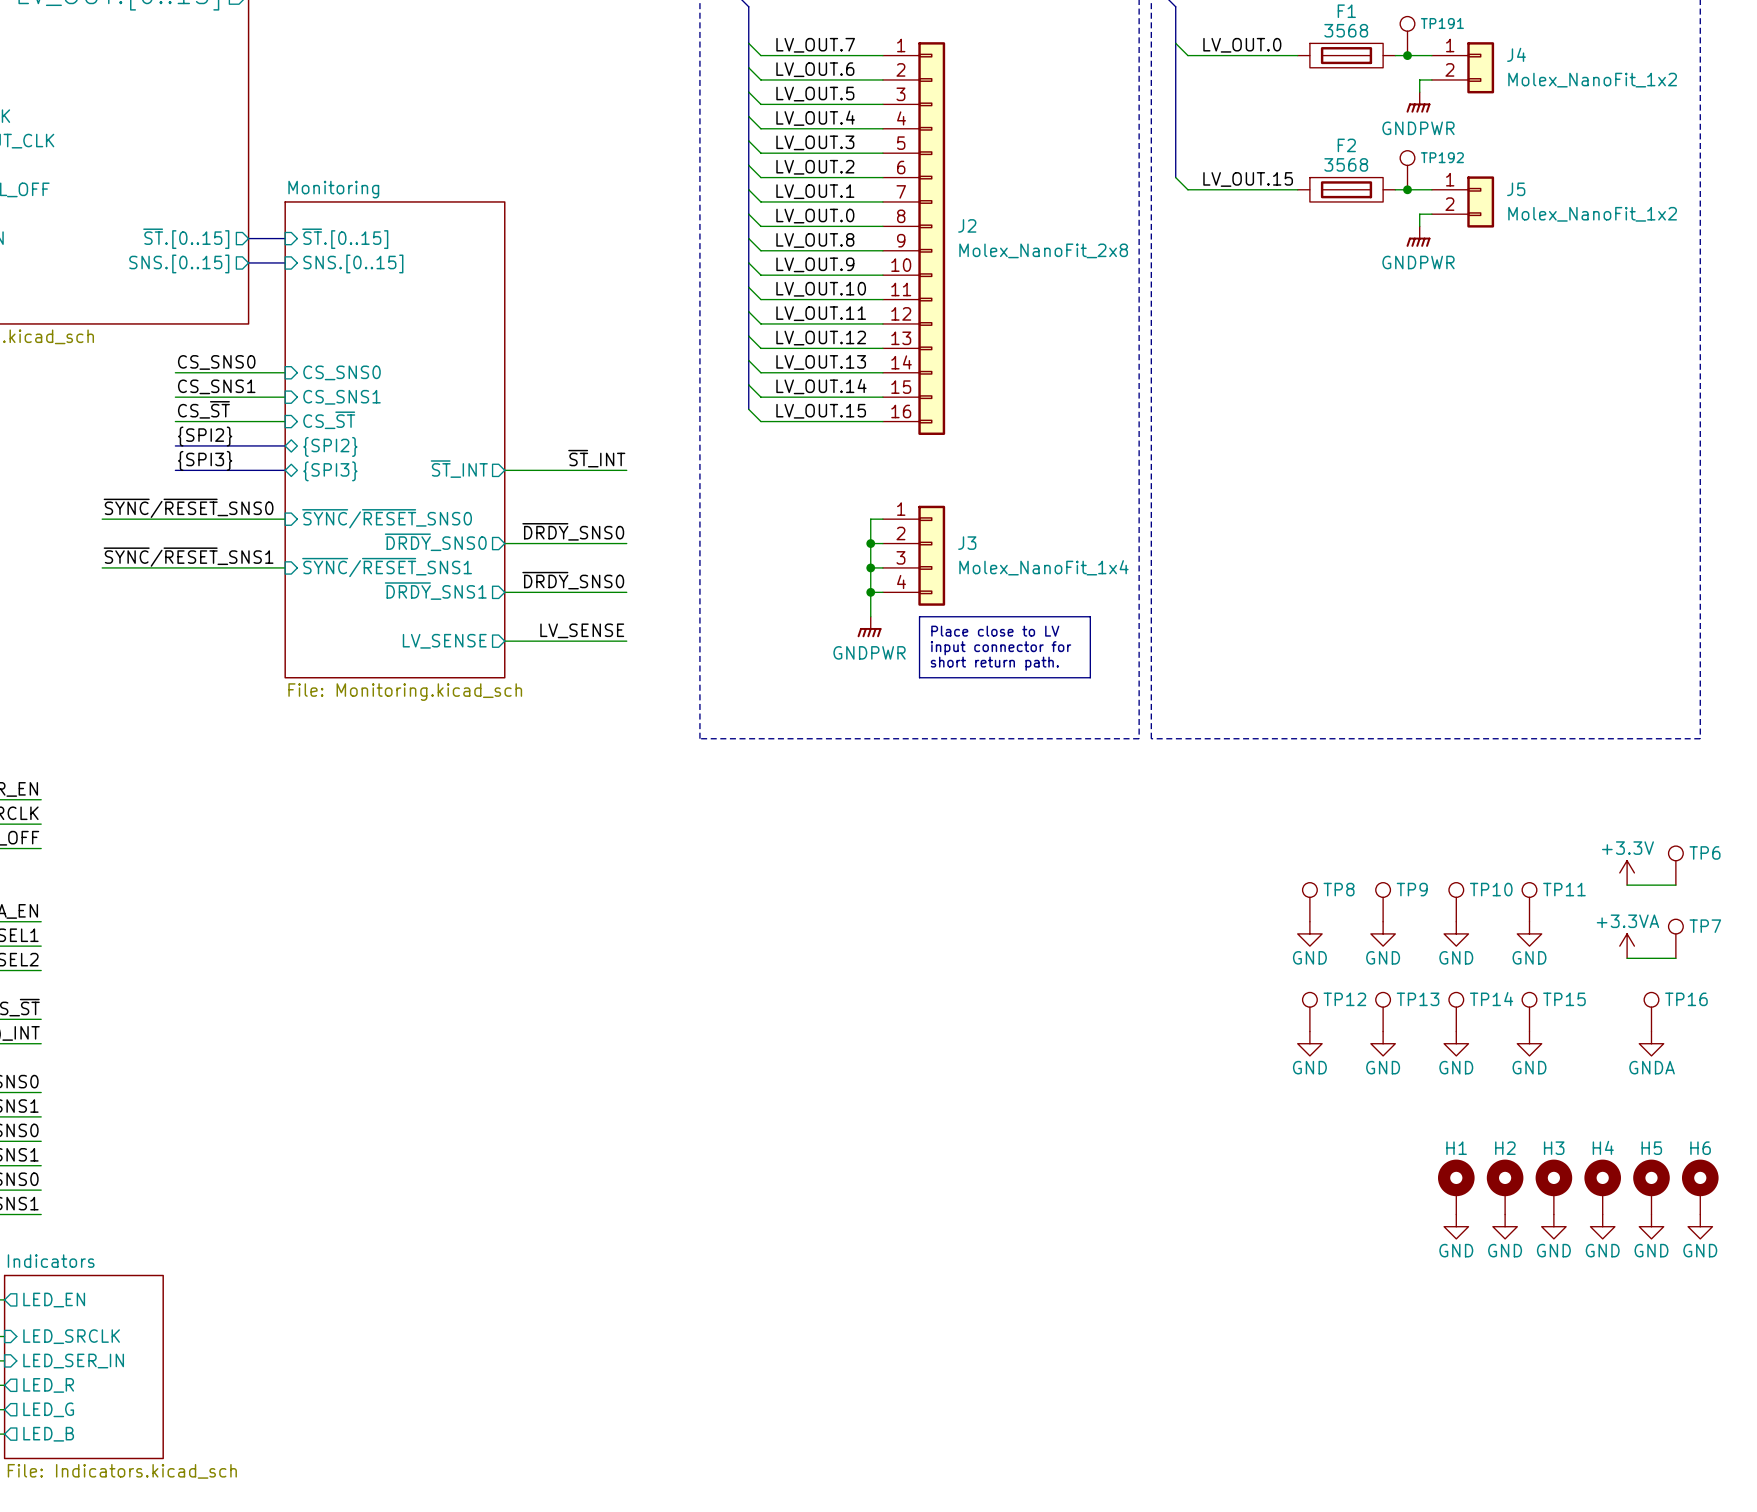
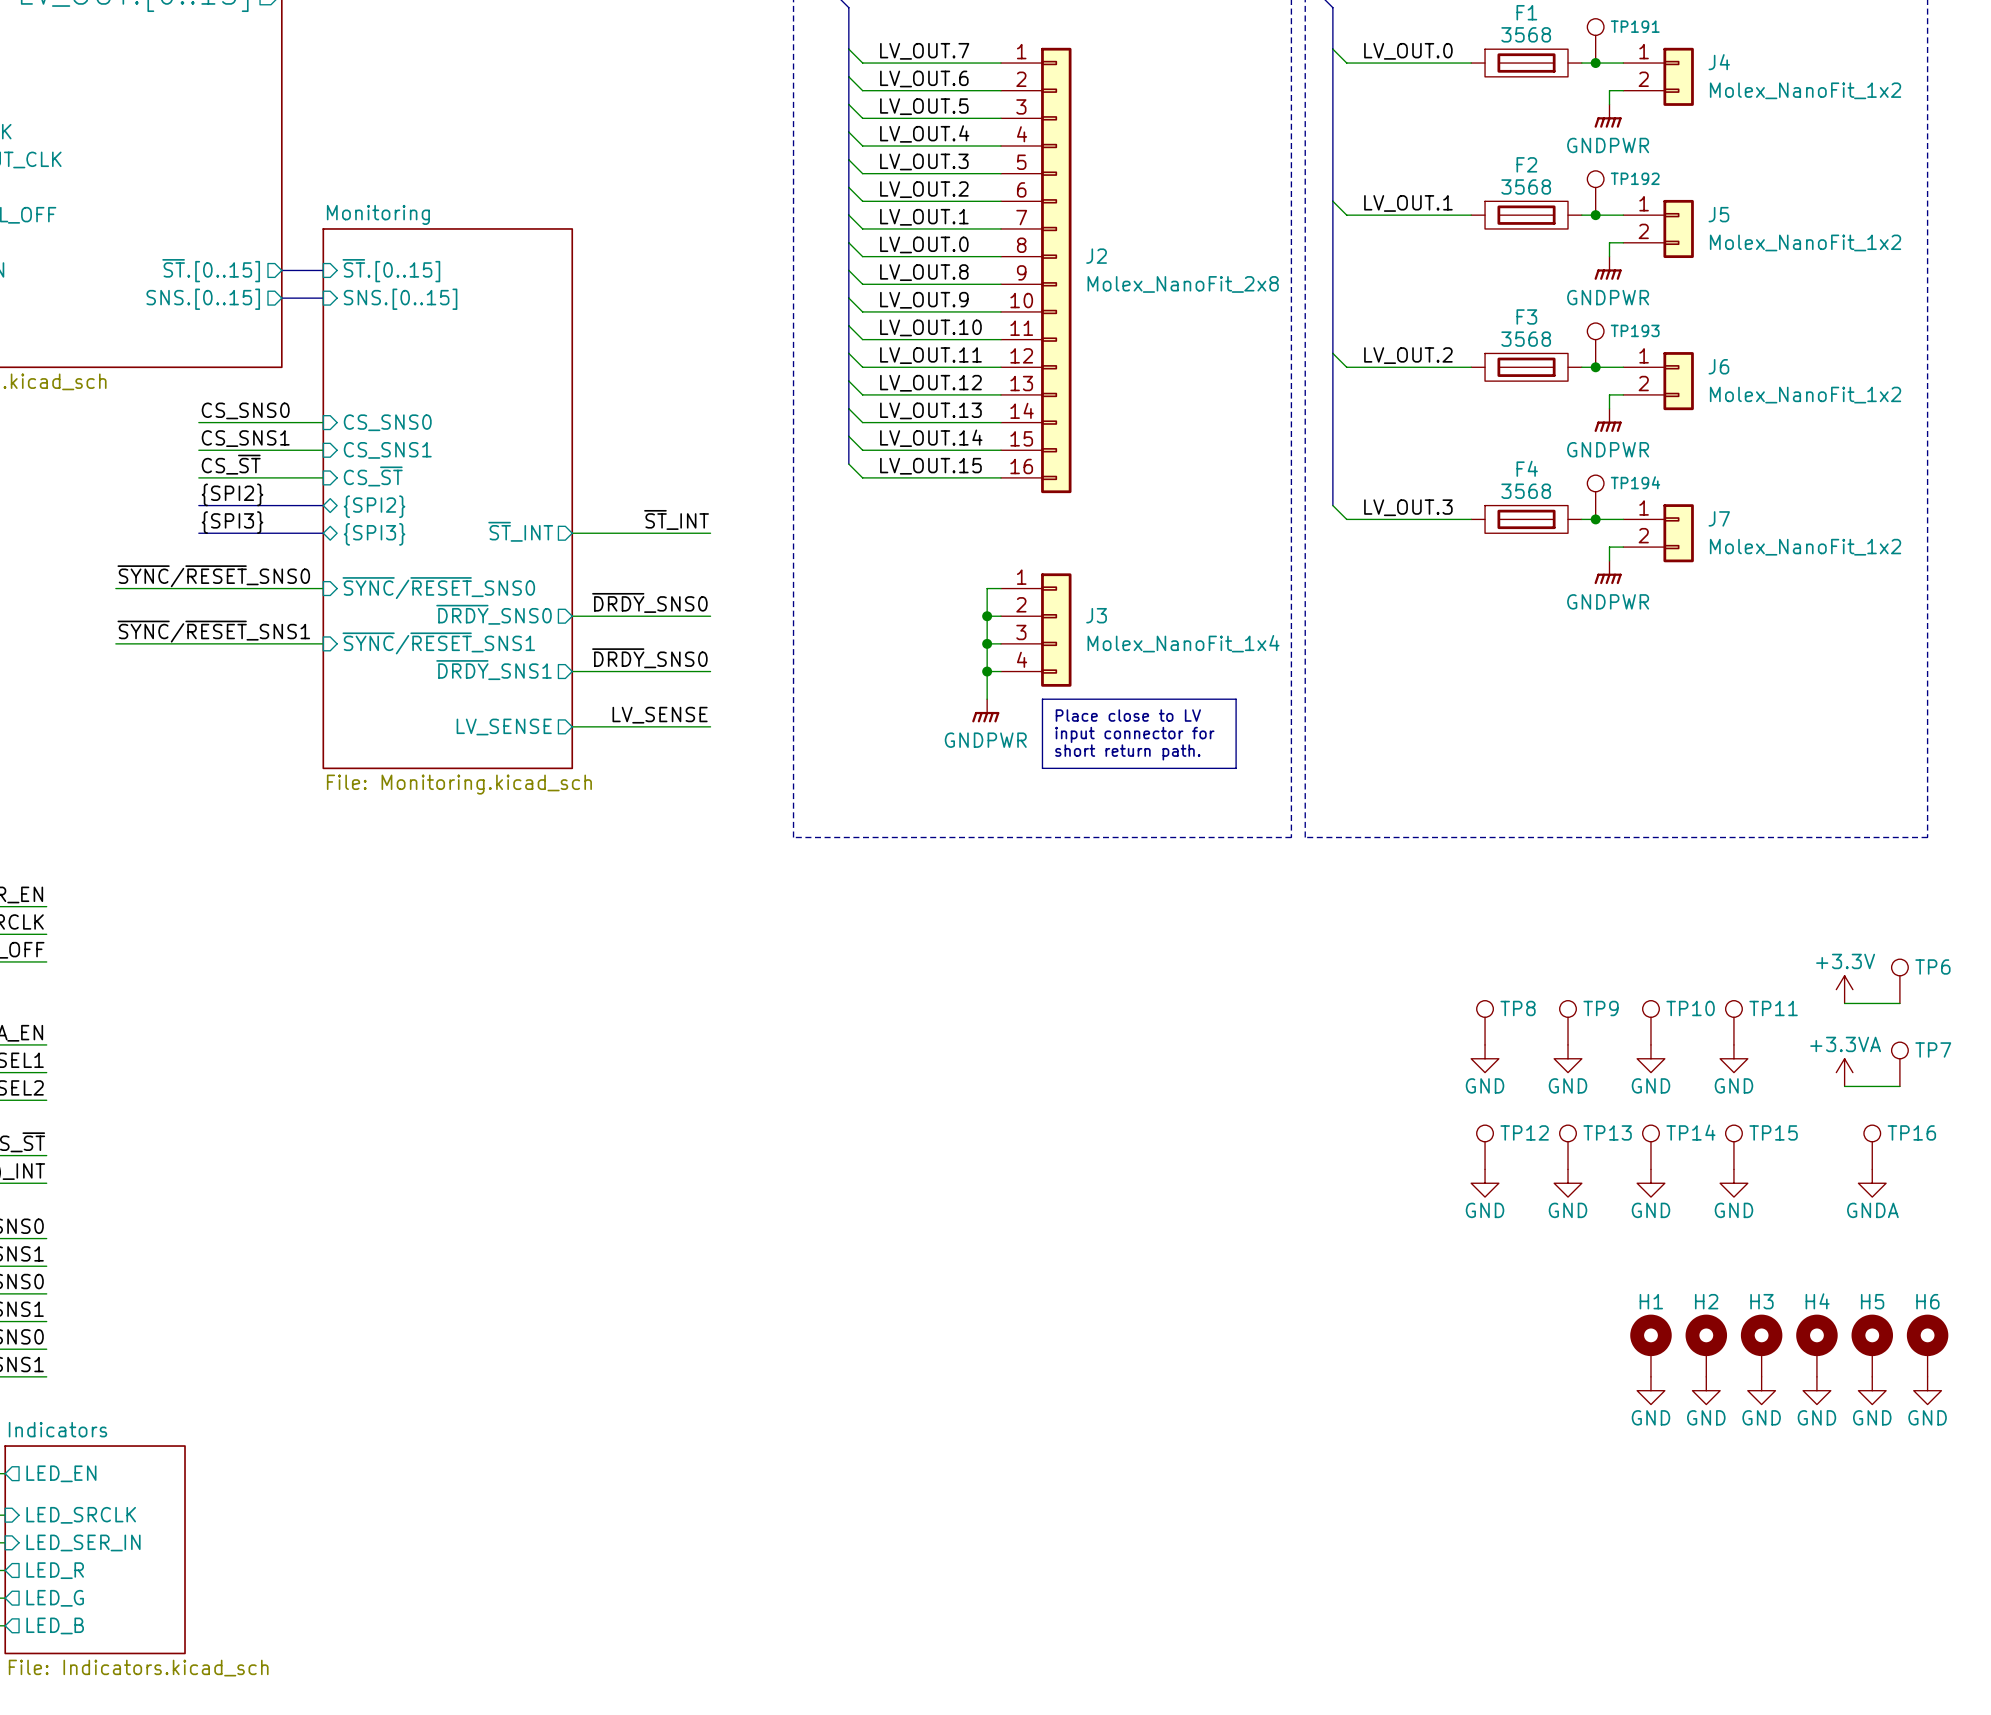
bus: none -> (1332, 201) (1332, 505)
label: LV_OUT.15 (1248, 179) -> LV_OUT.1 (1408, 203)
TP193: none -> (1595, 345)
wire: none -> (1332, 353) (1346, 367) (1471, 367)
label: none -> LV_OUT.2 (1408, 355)
F3: none -> 3568 (1526, 367)
wire: none -> (1581, 367) (1623, 367)
junction: none -> (1595, 367)
J6: none -> Molex_NanoFit_1x2 (1658, 381)
wire: none -> (1623, 394) (1609, 394) (1609, 408)
power symbol: none -> GNDPWR (1608, 420)
TP194: none -> (1595, 497)
wire: none -> (1332, 505) (1346, 519) (1471, 519)
label: none -> LV_OUT.3 (1408, 507)
F4: none -> 3568 (1526, 519)
wire: none -> (1581, 519) (1623, 519)
junction: none -> (1595, 519)
J7: none -> Molex_NanoFit_1x2 (1658, 533)
wire: none -> (1623, 547) (1609, 547) (1609, 560)
power symbol: none -> GNDPWR (1608, 572)

